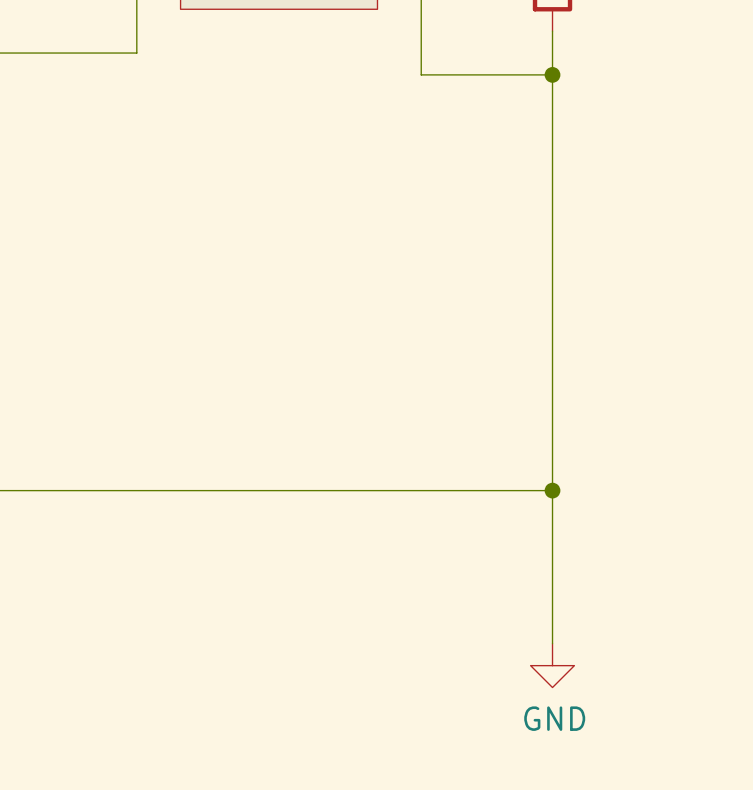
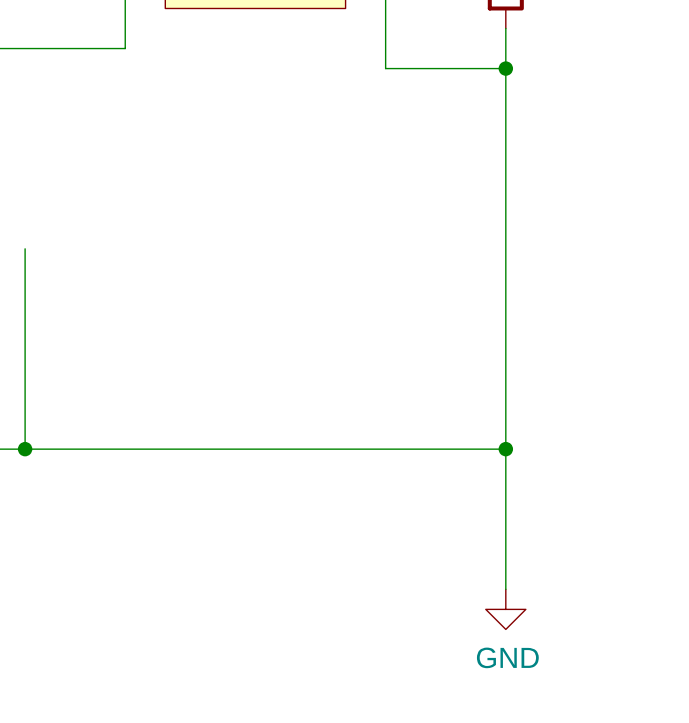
wire: none -> (25, 248) (25, 449)
junction: none -> (25, 449)

